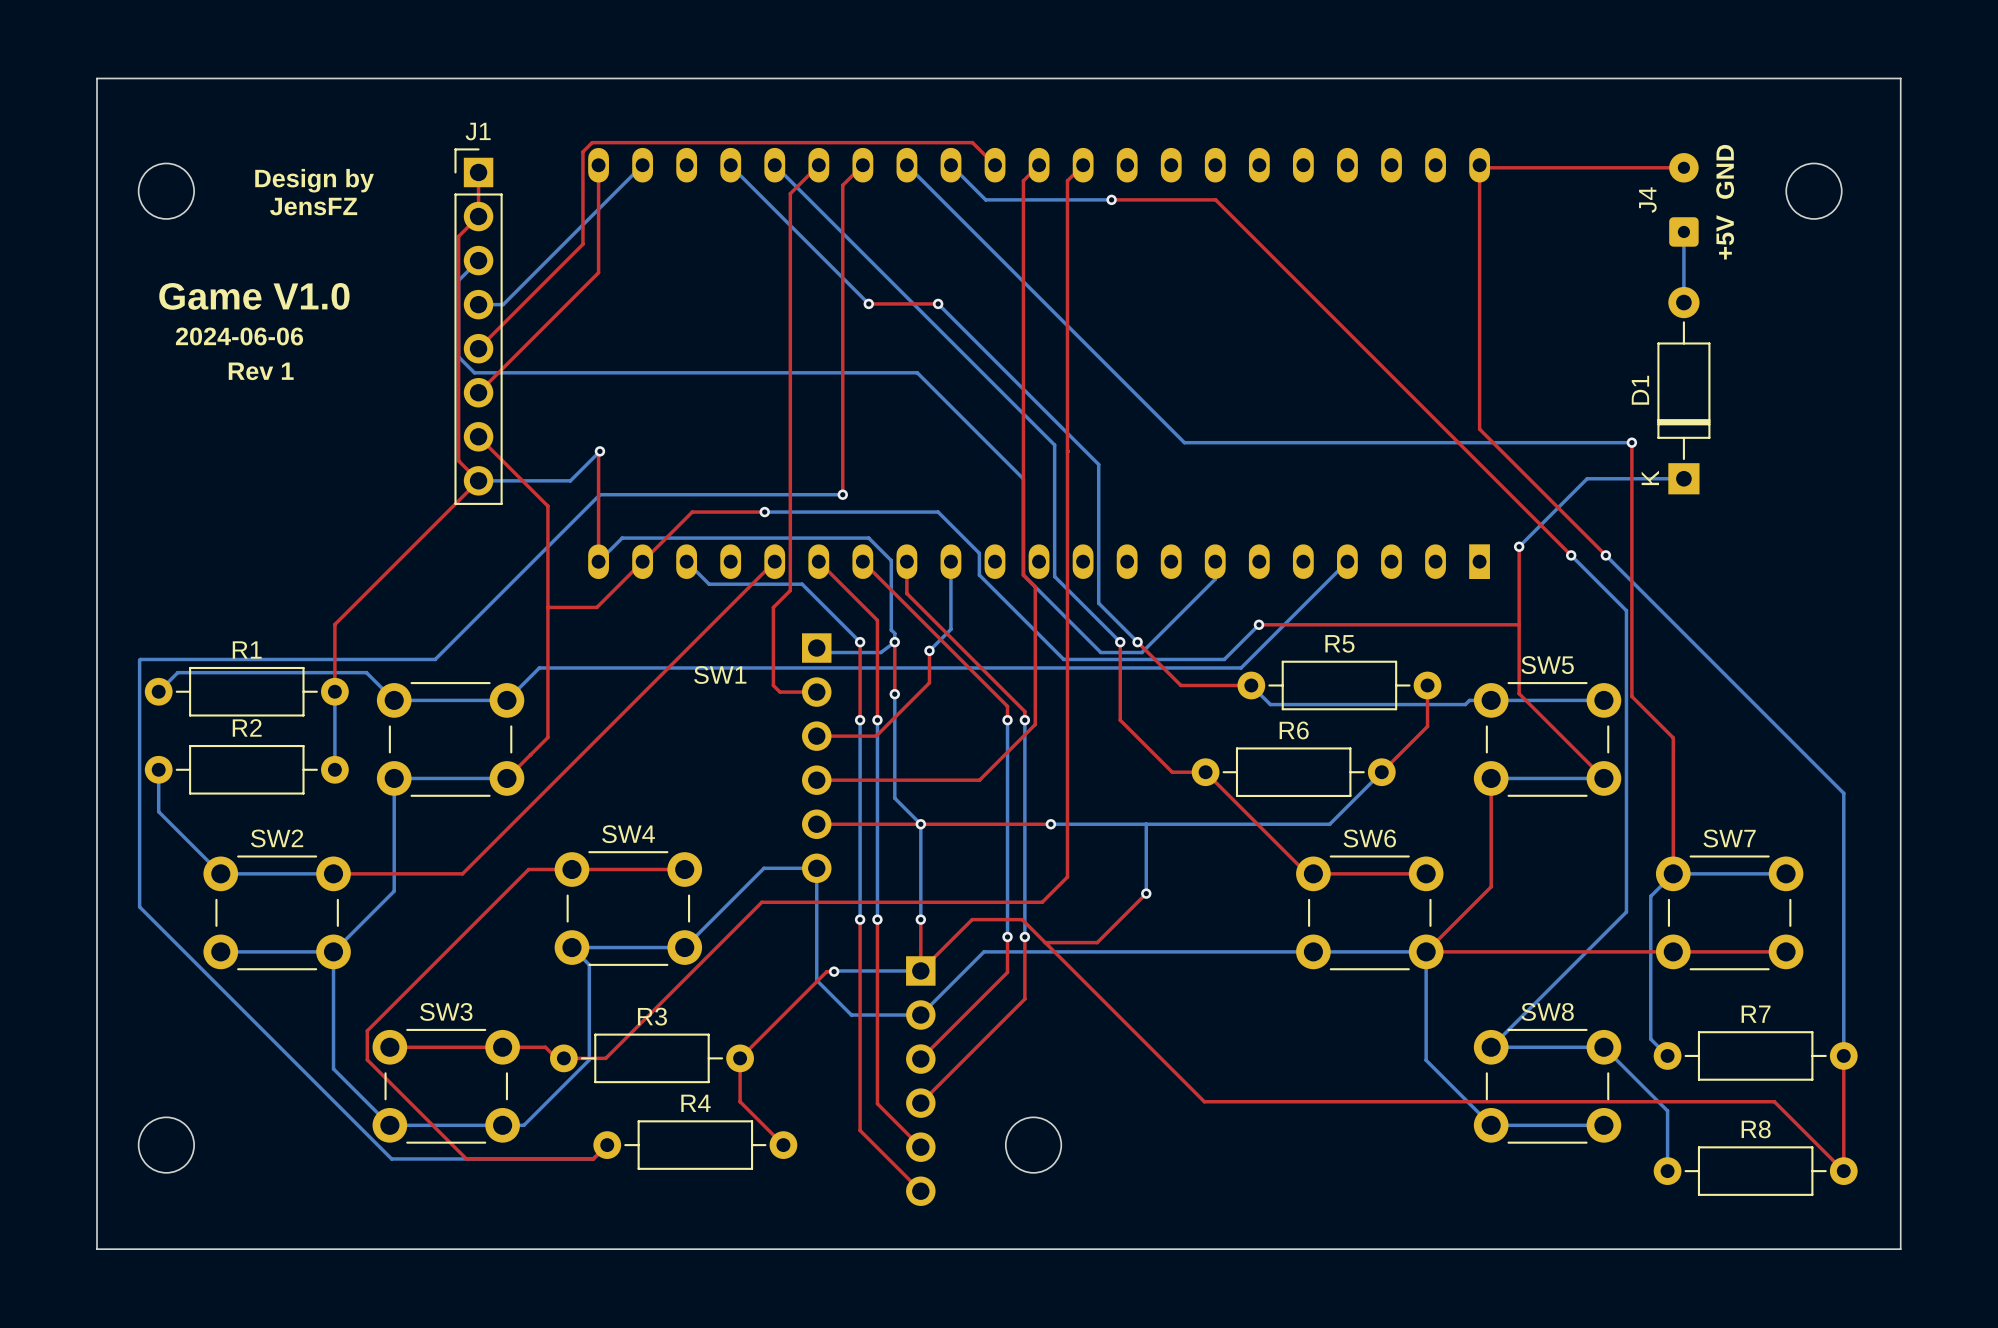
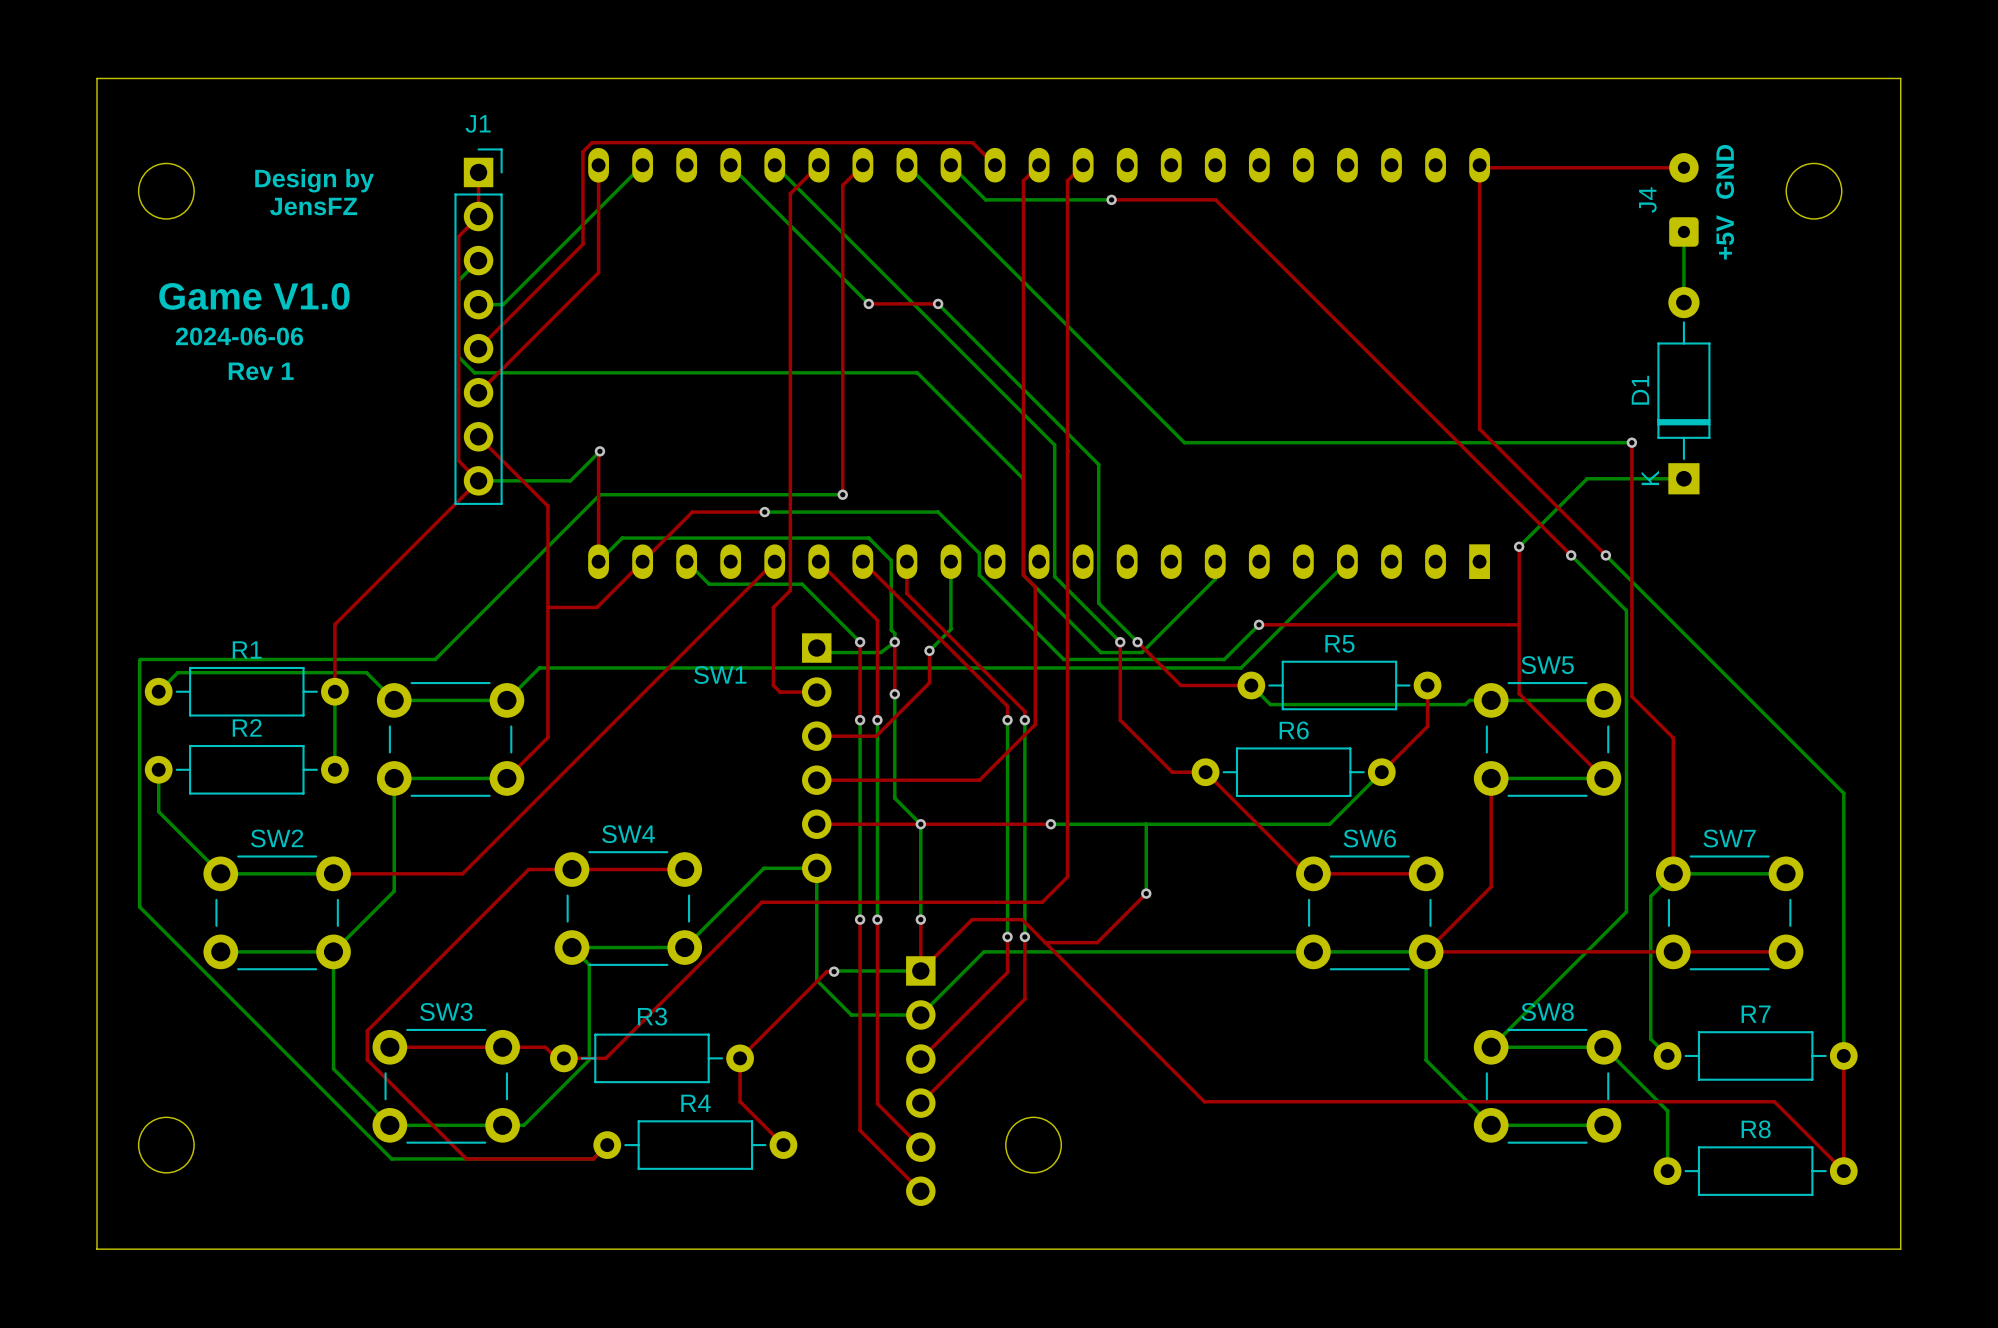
J1 footprint: [454, 148, 503, 505] -> [454, 148, 503, 505]

